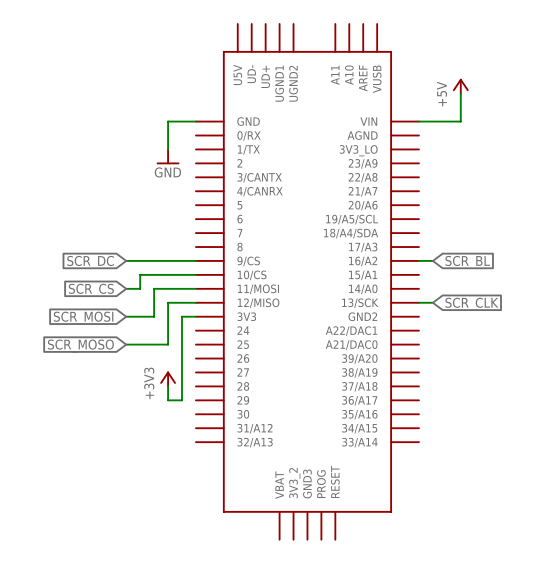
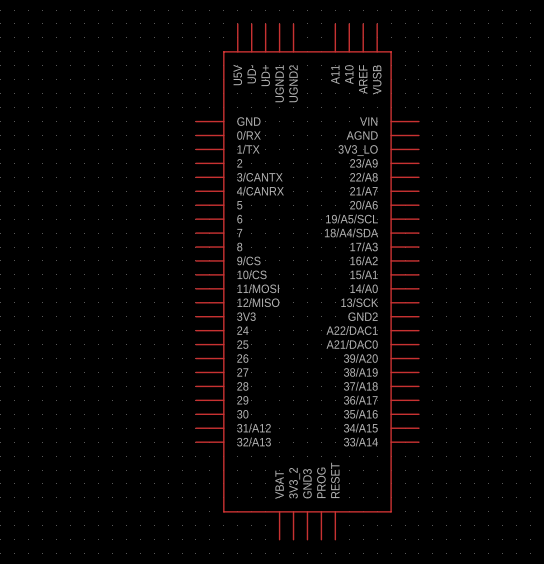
power symbol: +5V (460, 86) -> none
wire: (460, 93) (460, 121) (418, 121) -> none
wire: (195, 121) (168, 121) (168, 149) -> none
power symbol: GND (168, 156) -> none
wire: (126, 260) (195, 260) -> none
wire: (418, 260) (432, 260) -> none
global label: SCR_DC (90, 262) -> none
global label: SCR_BL (467, 262) -> none
wire: (195, 274) (140, 274) (140, 288) (126, 288) -> none
wire: (195, 288) (154, 288) (154, 316) (126, 316) -> none
global label: SCR_CS (91, 290) -> none
wire: (195, 302) (168, 302) (168, 344) (126, 344) -> none
wire: (418, 302) (432, 302) -> none
global label: SCR_CLK (471, 304) -> none
wire: (195, 316) (182, 316) (182, 400) (168, 400) (168, 386) -> none
global label: SCR_MOSI (83, 318) -> none
global label: SCR_MOSO (80, 346) -> none
power symbol: +3V3 (168, 379) -> none

